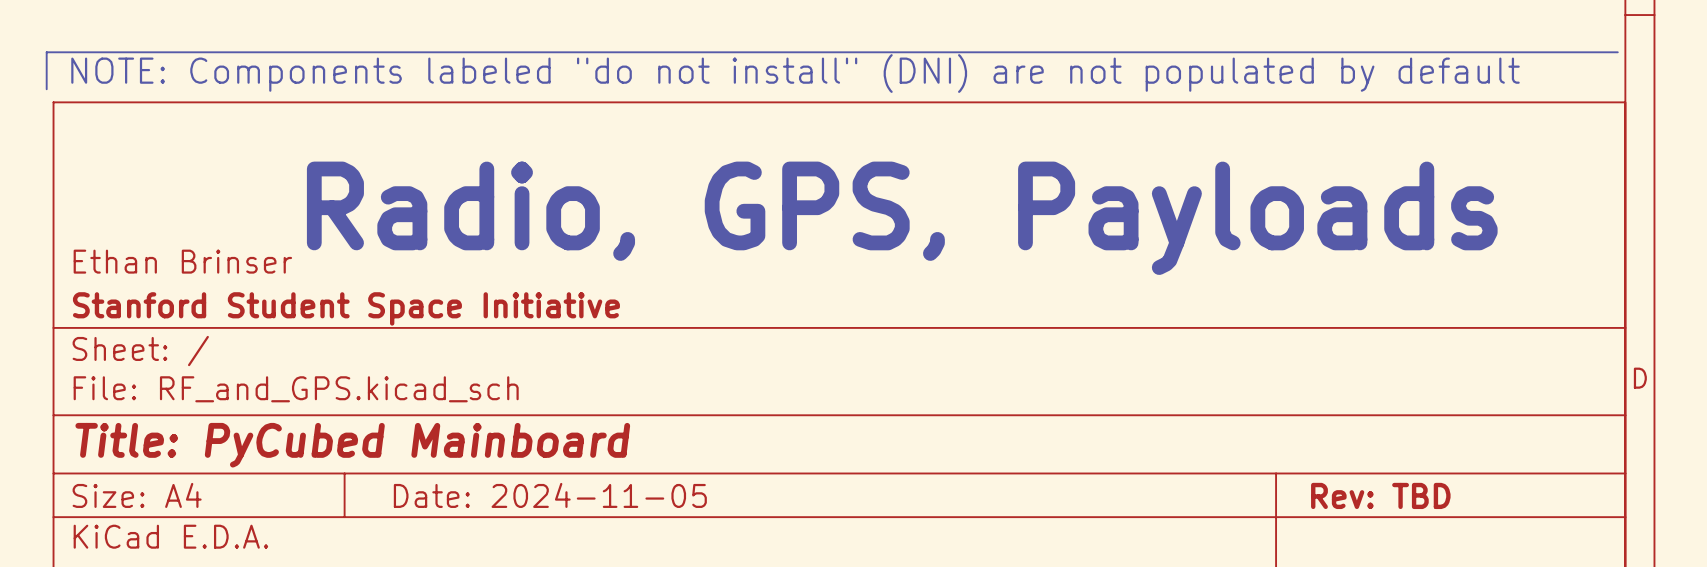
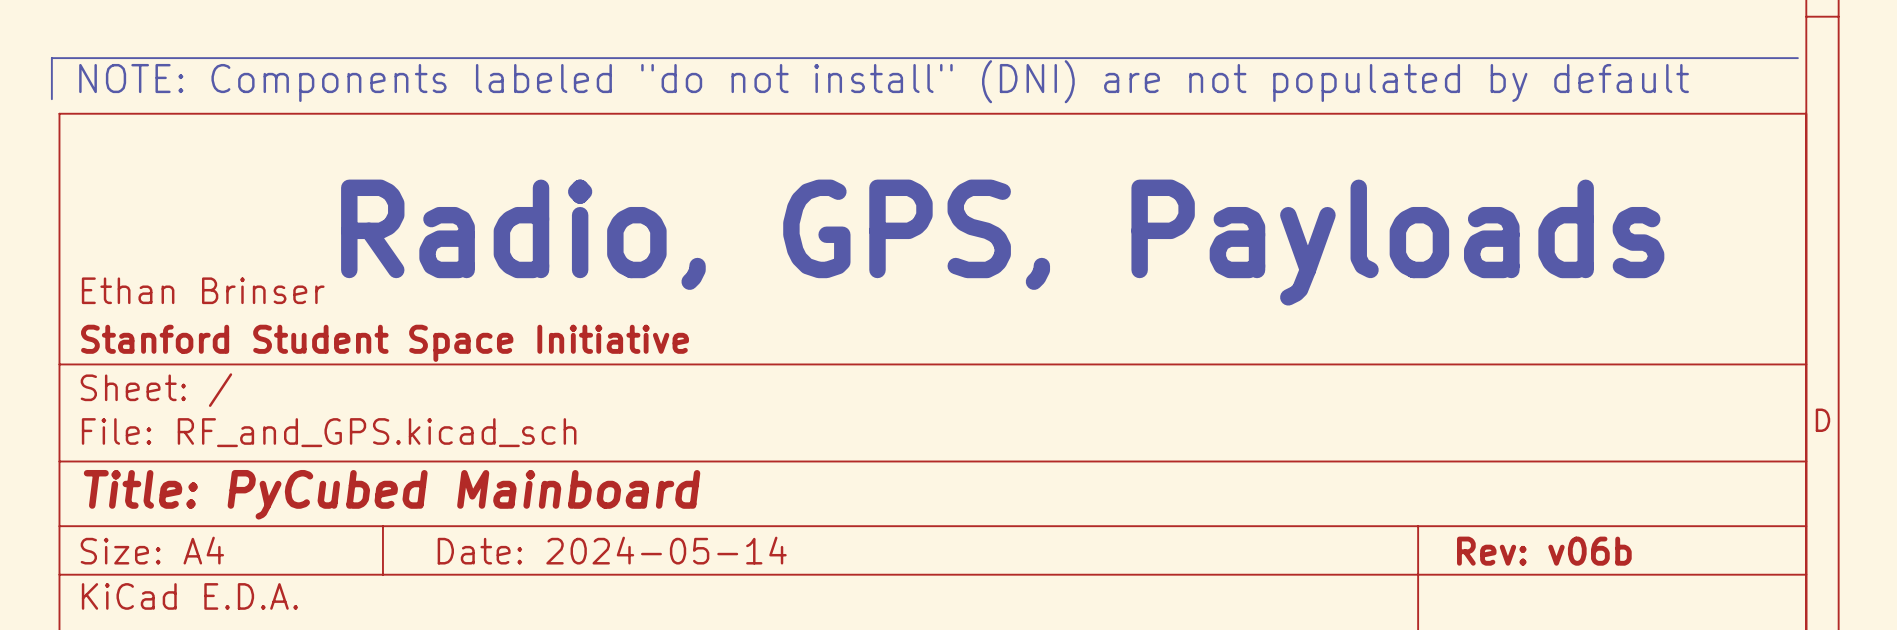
title block: Date: 2024-11-05 (550, 495) -> Date: 2024-05-14 (612, 550)
title block: Rev: TBD (1380, 495) -> Rev: v06b (1544, 551)

